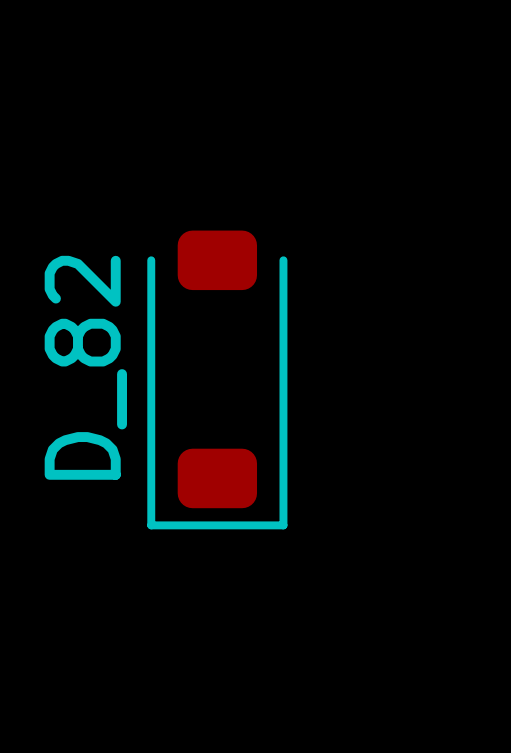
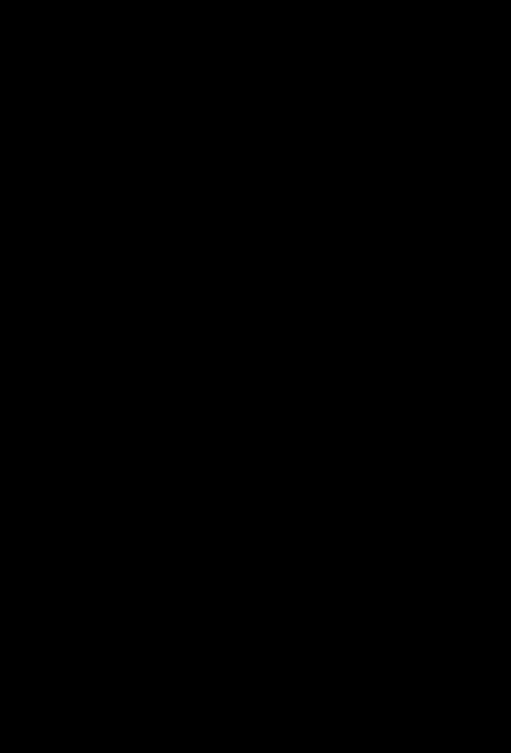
D_82: (217, 379) -> none

